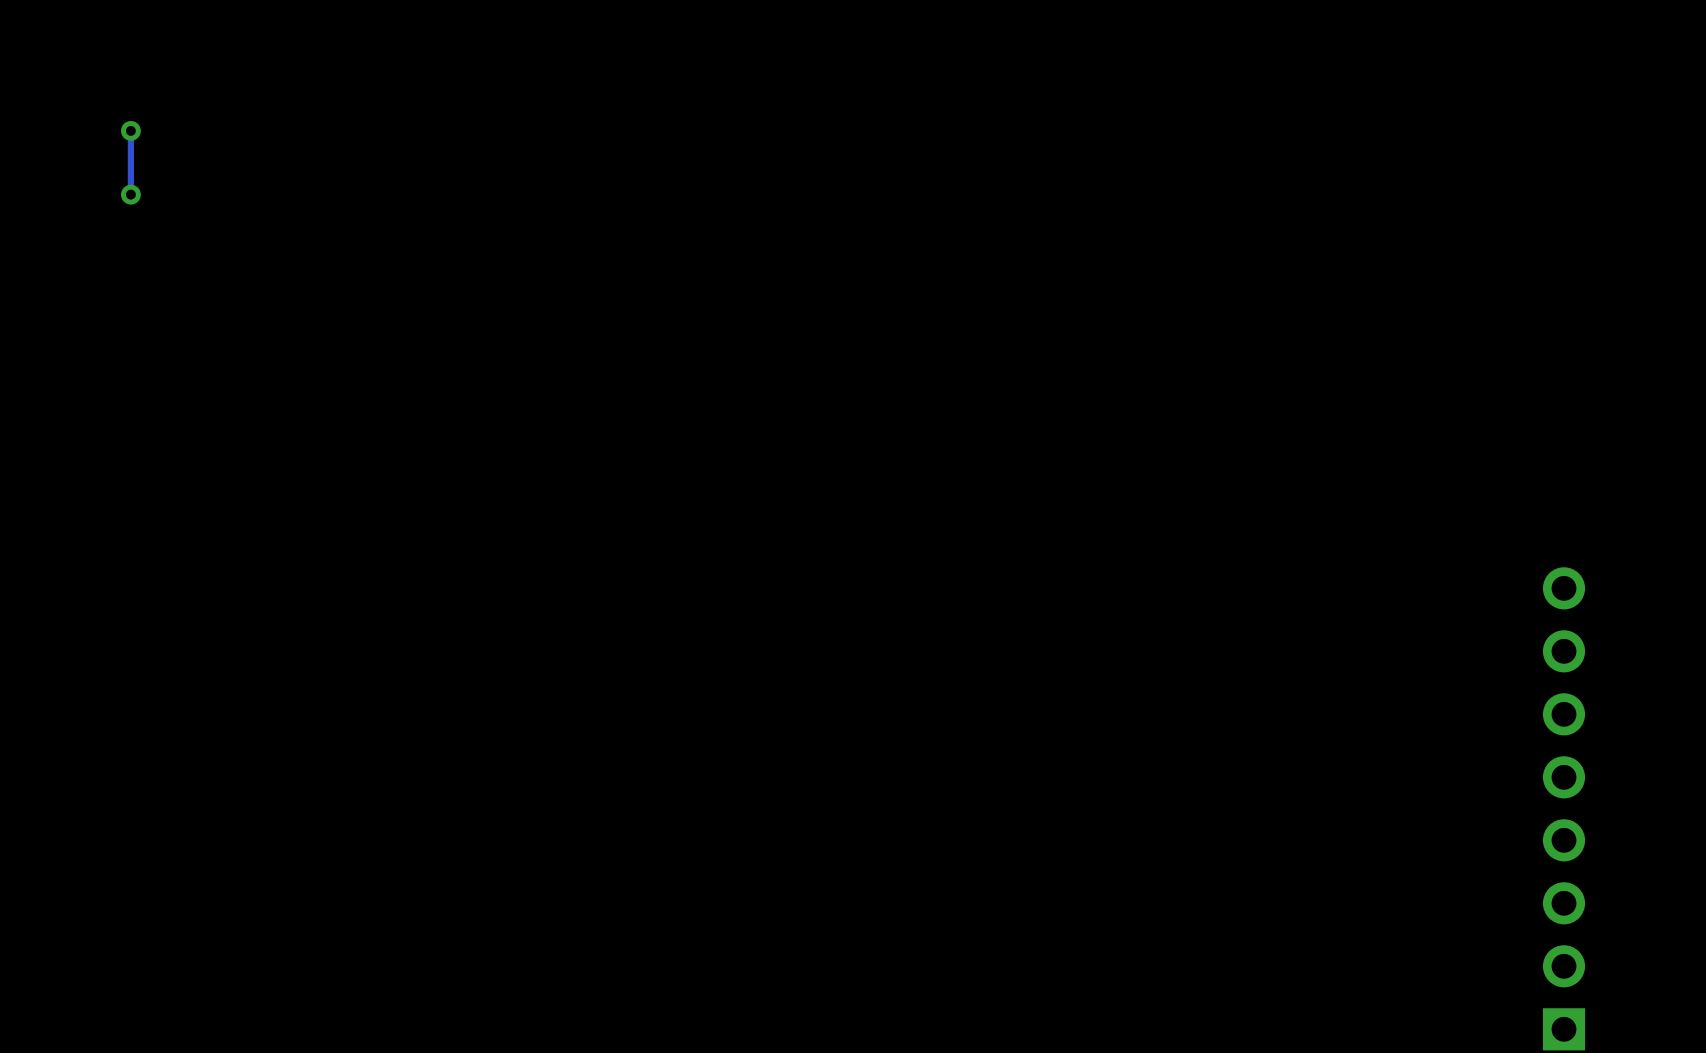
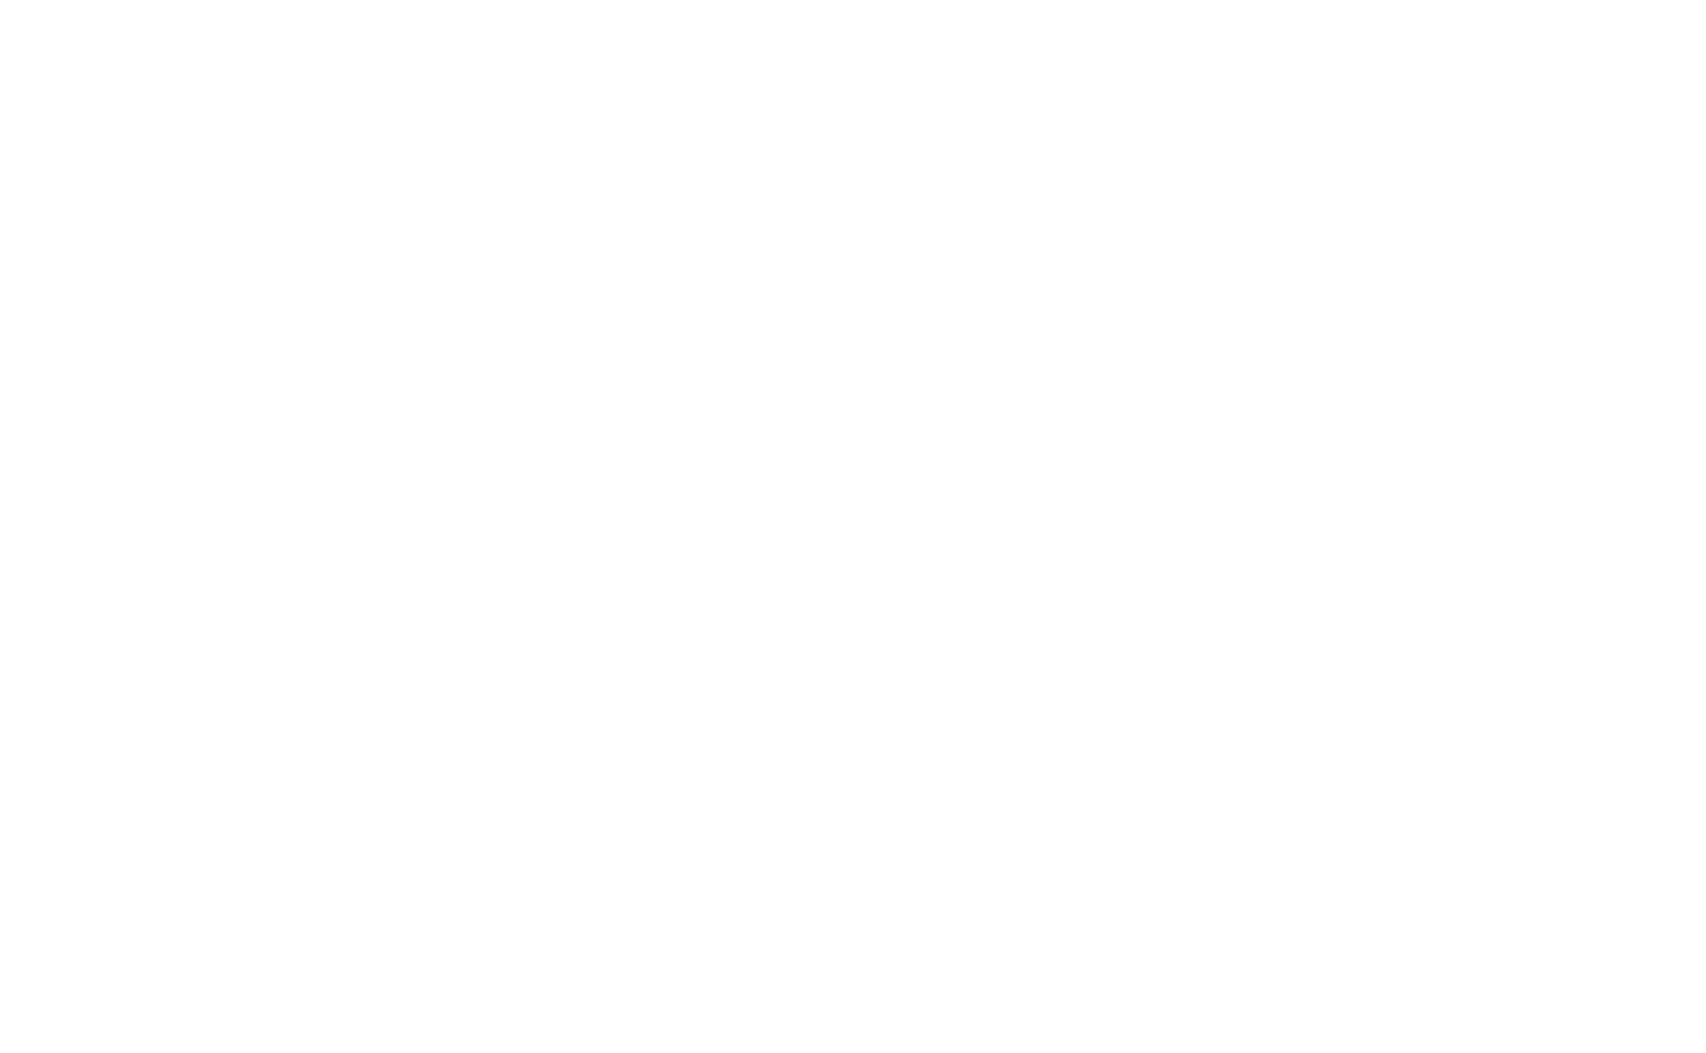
track: (130, 130) (130, 194) -> none
via: (130, 130) -> none
via: (130, 194) -> none
part: (1564, 808) -> none

